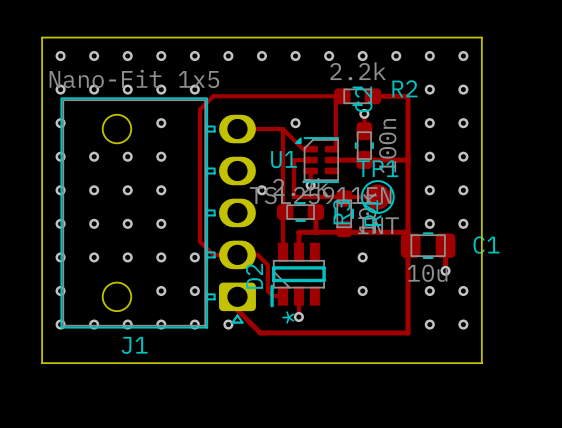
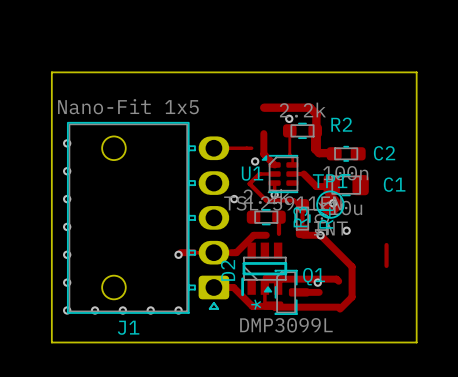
via: (60, 56) -> none
via: (94, 56) -> none
via: (127, 56) -> none
via: (161, 56) -> none
via: (194, 56) -> none
via: (228, 56) -> none
via: (261, 56) -> none
via: (295, 56) -> none
via: (329, 56) -> none
via: (362, 56) -> none
via: (396, 56) -> none
via: (429, 56) -> none
via: (463, 56) -> none
track: none -> (264, 107) (309, 107) (316, 114) (316, 130)
via: (60, 89) -> none
via: (94, 89) -> none
via: (127, 89) -> none
via: (161, 89) -> none
via: (194, 89) -> none
via: (429, 89) -> none
via: (463, 89) -> none
via: none -> (289, 118)
R2 position: (357, 96) -> (302, 130)
track: (372, 96) (407, 96) (407, 332) (260, 332) (237, 310) -> none
track: none -> (289, 130) (289, 154) (292, 157) (292, 165)
track: none -> (315, 130) (315, 149) (319, 153) (333, 153)
via: (364, 113) -> none
via: (161, 123) -> none
via: (295, 123) -> none
via: (429, 123) -> none
via: (463, 123) -> none
via: none -> (255, 161)
C2 rotation: 0° (364, 145) -> 90° clockwise (346, 153)
C2 position: (364, 145) -> (346, 153)
track: (310, 149) (303, 149) (282, 129) (282, 247) -> (274, 164) (263, 154) (263, 133)
track: (335, 149) (335, 96) (213, 96) (199, 109) (199, 241) (213, 254) -> (180, 252) (193, 252)
via: (94, 156) -> none
via: (127, 156) -> none
via: (161, 156) -> none
via: (429, 156) -> none
via: (463, 156) -> none
track: (293, 160) (293, 197) (377, 197) -> (260, 174) (249, 183) (266, 200) (294, 200) (302, 208) (302, 222)
track: (345, 160) (407, 160) -> (303, 174) (316, 186) (333, 186) (331, 185)
via: (94, 190) -> none
via: (127, 190) -> none
via: (161, 190) -> none
via: (429, 190) -> none
via: (463, 190) -> none
via: none -> (333, 203)
via: (94, 223) -> none
via: (127, 223) -> none
via: (161, 223) -> none
via: (429, 223) -> none
via: (463, 223) -> none
via: none -> (346, 230)
track: (407, 232) (298, 232) (298, 247) -> none
track: none -> (303, 235) (320, 235) (352, 266) (352, 297) (340, 309)
via: none -> (320, 235)
C1 position: (428, 245) -> (346, 185)
track: (257, 254) (267, 264) (267, 290) (272, 296) (282, 296) -> (230, 252) (236, 252) (253, 235) (266, 235)
via: (94, 257) -> none
via: (127, 257) -> none
via: (161, 257) -> none
via: (362, 257) -> none
via: (445, 270) -> none
track: none -> (273, 279) (336, 279) (338, 281)
via: (161, 290) -> none
via: (194, 290) -> none
via: (429, 290) -> none
via: (463, 290) -> none
track: none -> (213, 287) (233, 287) (252, 306) (274, 306)
Q1: none -> DMP3099L (286, 292)
track: none -> (299, 292) (319, 292)
via: (298, 317) -> none
track: none -> (273, 305) (274, 307) (339, 307)
via: (228, 324) -> none
via: (429, 324) -> none
via: (463, 324) -> none

